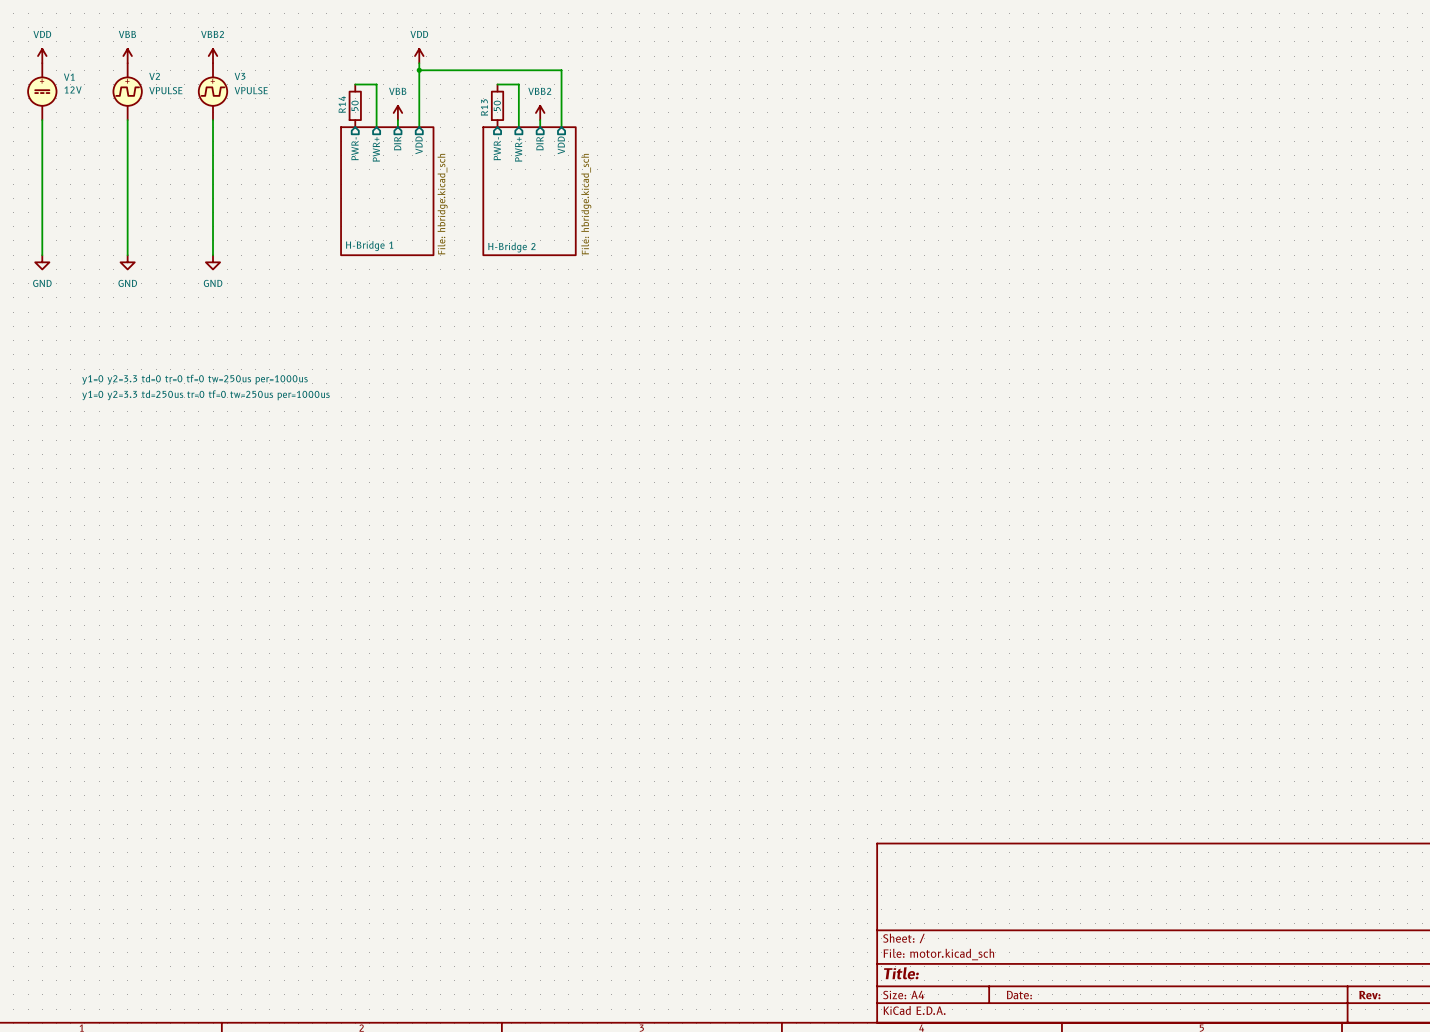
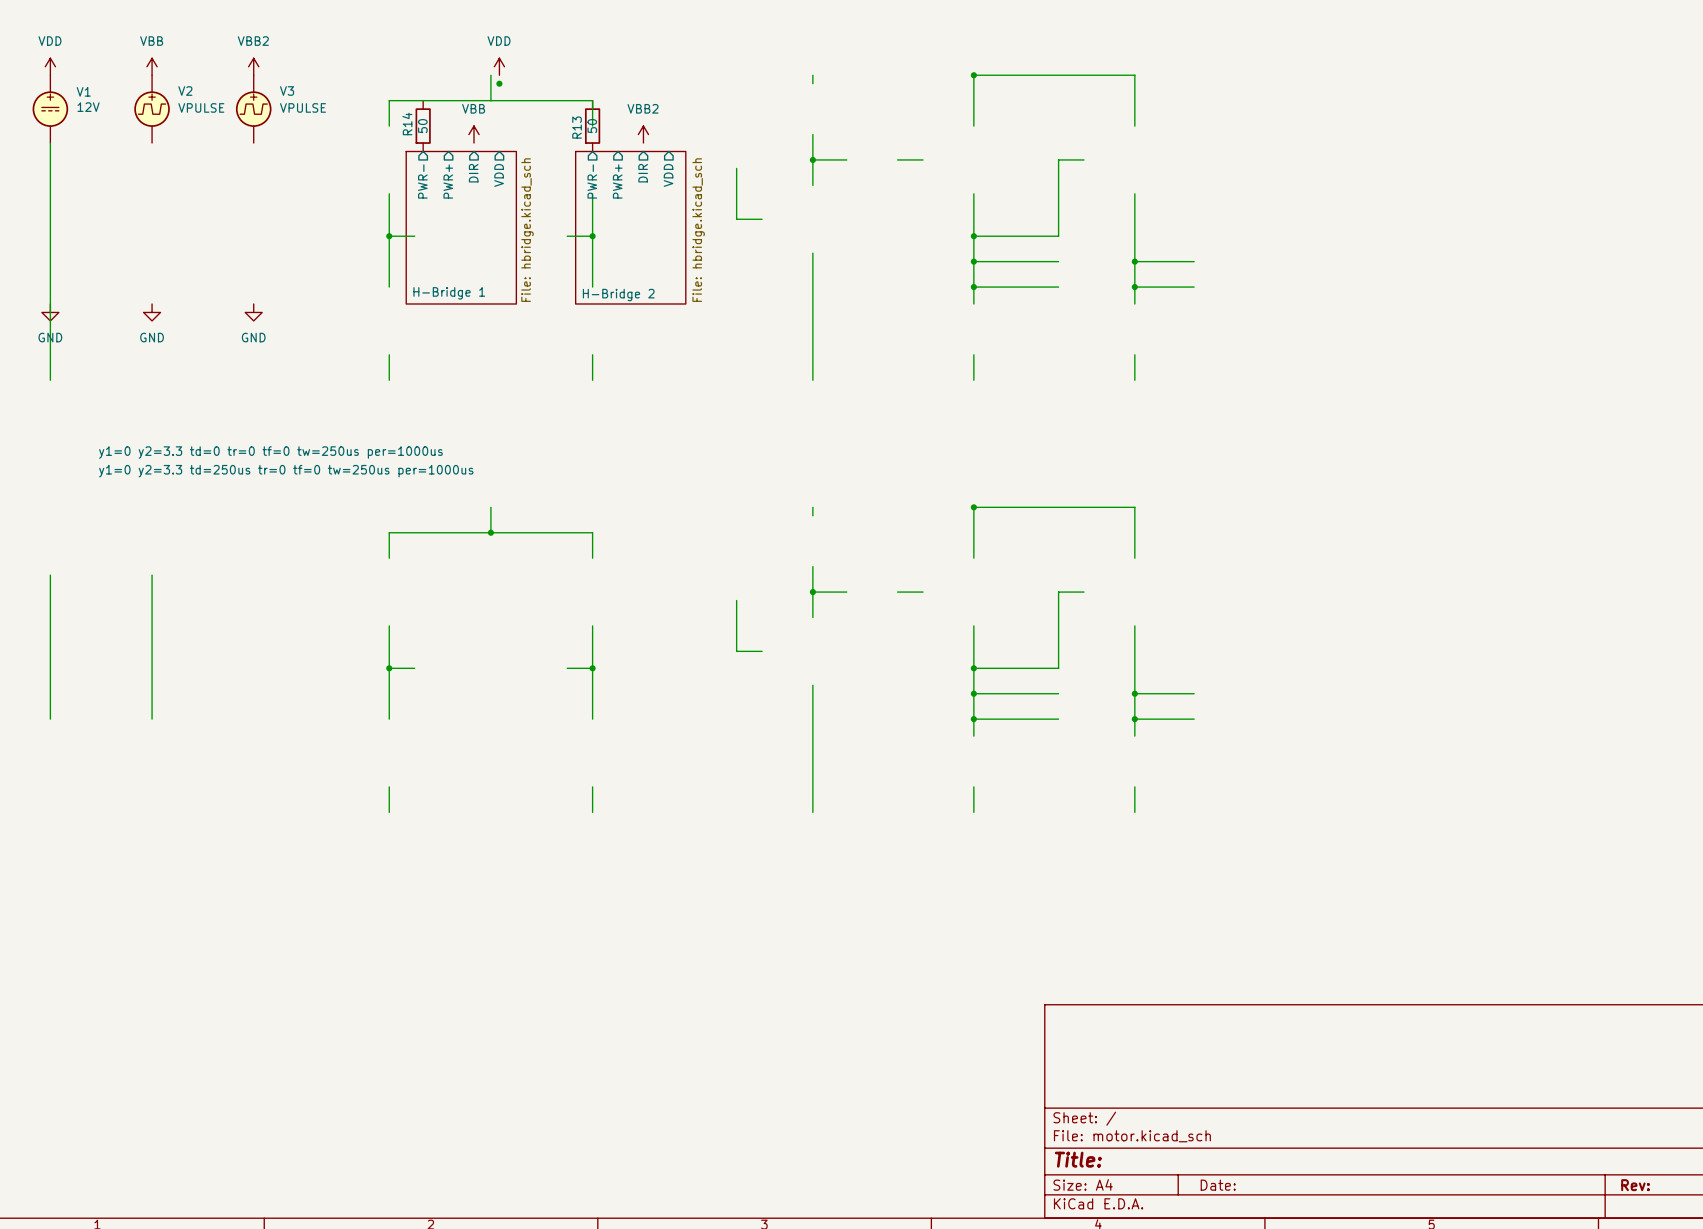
wire: none -> (490, 75) (490, 100)
wire: (419, 63) (419, 127) -> none
wire: none -> (812, 75) (812, 83)
junction: none -> (973, 75)
wire: (419, 70) (561, 70) (561, 127) -> none
wire: none -> (423, 100) (389, 100) (389, 126)
wire: (376, 84) (376, 127) -> (448, 100) (592, 100) (592, 126)
wire: (497, 84) (518, 84) (518, 127) -> none
wire: none -> (973, 126) (973, 75) (1134, 75) (1134, 126)
wire: none -> (812, 134) (812, 185)
wire: (127, 120) (127, 255) -> none
wire: (213, 120) (213, 255) -> none
wire: (397, 120) (397, 127) -> none
wire: (540, 120) (540, 127) -> none
wire: none -> (812, 159) (846, 159)
junction: none -> (812, 159)
wire: none -> (897, 159) (923, 159)
wire: none -> (1084, 159) (1058, 159) (1058, 236) (973, 236)
wire: none -> (736, 168) (736, 219) (762, 219)
wire: none -> (389, 193) (389, 287)
wire: none -> (592, 193) (592, 287)
wire: none -> (973, 193) (973, 303)
wire: none -> (1134, 193) (1134, 303)
wire: none -> (389, 236) (414, 236)
junction: none -> (389, 236)
wire: none -> (567, 236) (592, 236)
junction: none -> (592, 236)
junction: none -> (973, 236)
wire: none -> (812, 253) (812, 380)
wire: none -> (973, 261) (1058, 261)
junction: none -> (973, 261)
wire: none -> (1134, 261) (1194, 261)
junction: none -> (1134, 261)
wire: none -> (973, 287) (1058, 287)
junction: none -> (973, 287)
wire: none -> (1134, 287) (1194, 287)
junction: none -> (1134, 287)
wire: none -> (50, 303) (50, 380)
wire: none -> (389, 354) (389, 380)
wire: none -> (592, 354) (592, 380)
wire: none -> (973, 354) (973, 380)
wire: none -> (1134, 354) (1134, 380)
wire: none -> (490, 507) (490, 532)
wire: none -> (812, 507) (812, 515)
junction: none -> (973, 507)
junction: none -> (490, 532)
wire: none -> (389, 558) (389, 532) (592, 532) (592, 558)
wire: none -> (973, 558) (973, 507) (1134, 507) (1134, 558)
wire: none -> (812, 566) (812, 617)
wire: none -> (50, 575) (50, 719)
wire: none -> (152, 575) (152, 719)
wire: none -> (812, 592) (846, 592)
junction: none -> (812, 592)
wire: none -> (897, 592) (923, 592)
wire: none -> (1084, 592) (1058, 592) (1058, 668) (973, 668)
wire: none -> (736, 600) (736, 651) (762, 651)
wire: none -> (389, 625) (389, 719)
wire: none -> (592, 625) (592, 719)
wire: none -> (973, 625) (973, 736)
wire: none -> (1134, 625) (1134, 736)
wire: none -> (389, 668) (414, 668)
junction: none -> (389, 668)
wire: none -> (567, 668) (592, 668)
junction: none -> (592, 668)
junction: none -> (973, 668)
wire: none -> (812, 685) (812, 812)
wire: none -> (973, 693) (1058, 693)
junction: none -> (973, 693)
wire: none -> (1134, 693) (1194, 693)
junction: none -> (1134, 693)
wire: none -> (973, 719) (1058, 719)
junction: none -> (973, 719)
wire: none -> (1134, 719) (1194, 719)
junction: none -> (1134, 719)
wire: none -> (389, 786) (389, 812)
wire: none -> (592, 786) (592, 812)
wire: none -> (973, 786) (973, 812)
wire: none -> (1134, 786) (1134, 812)

